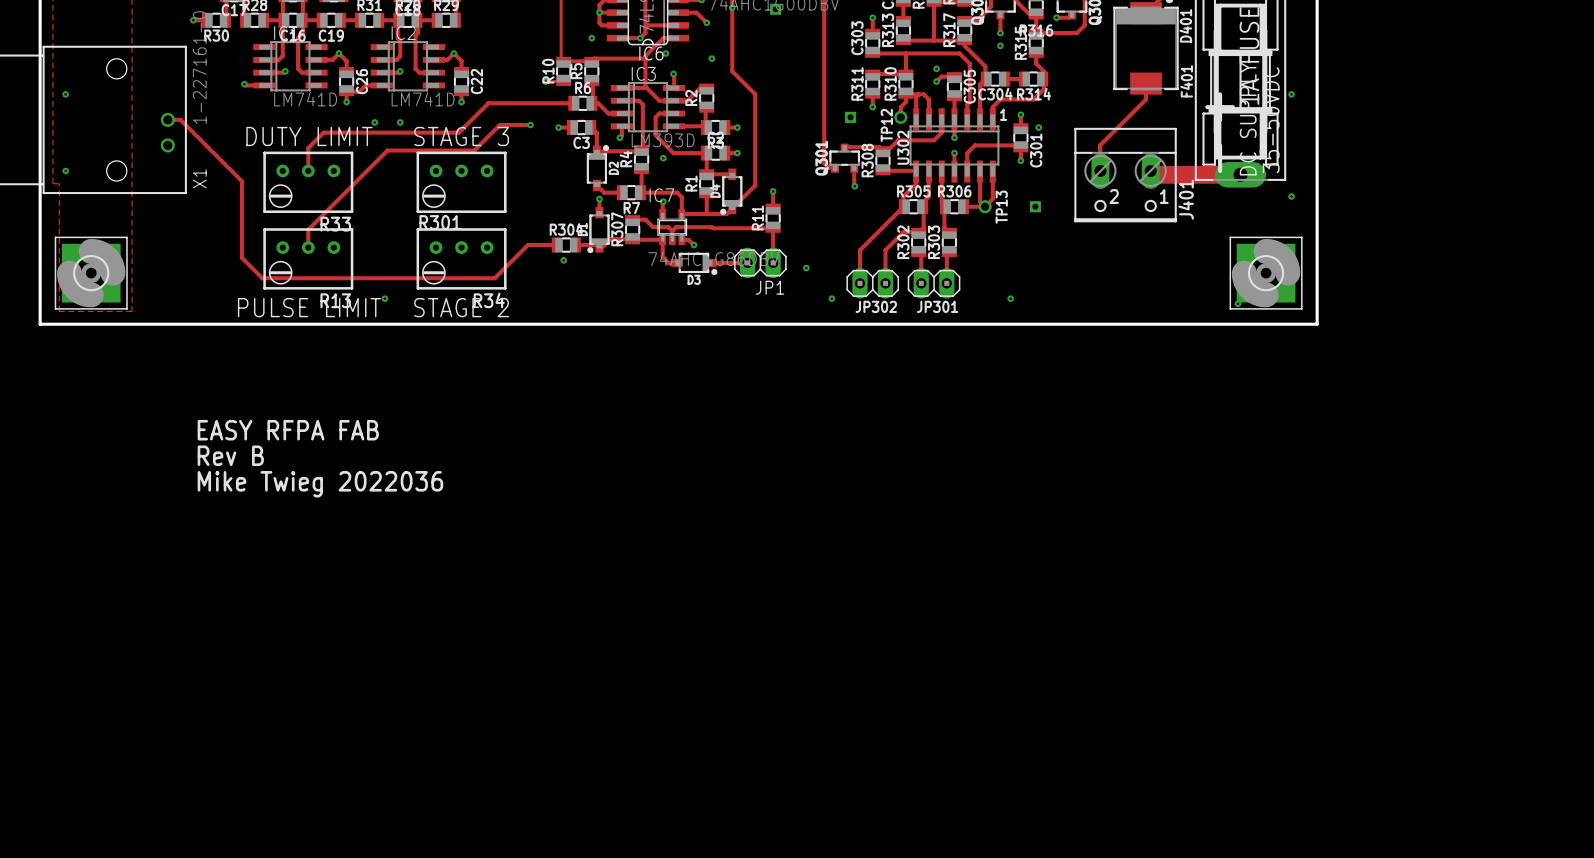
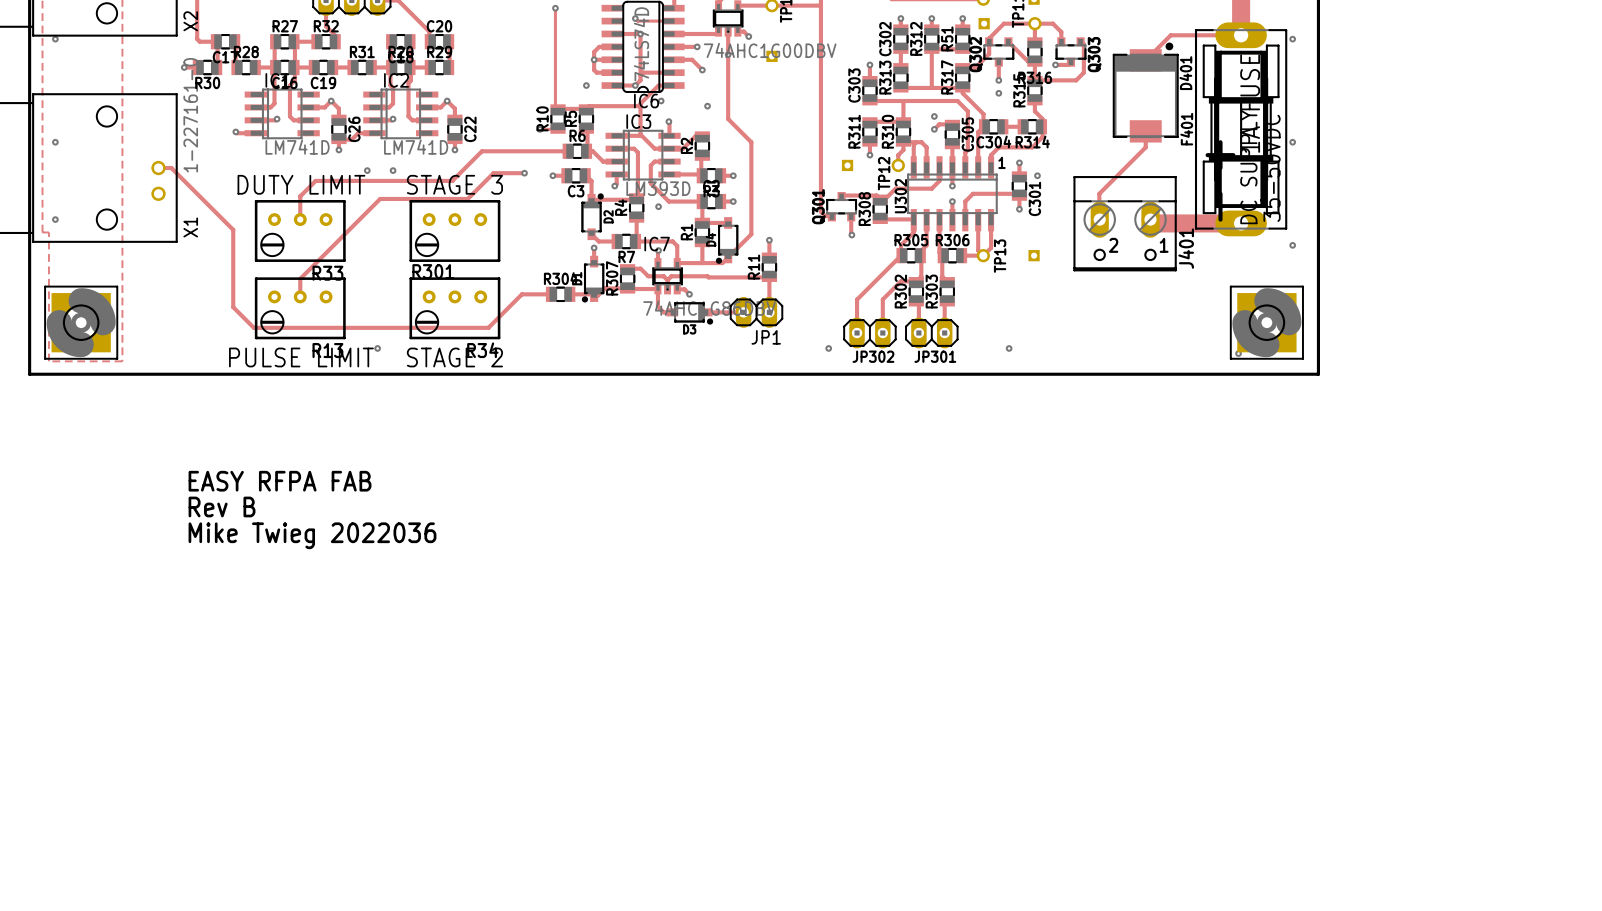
via: (563, 260) -> none
via: (806, 268) -> none

